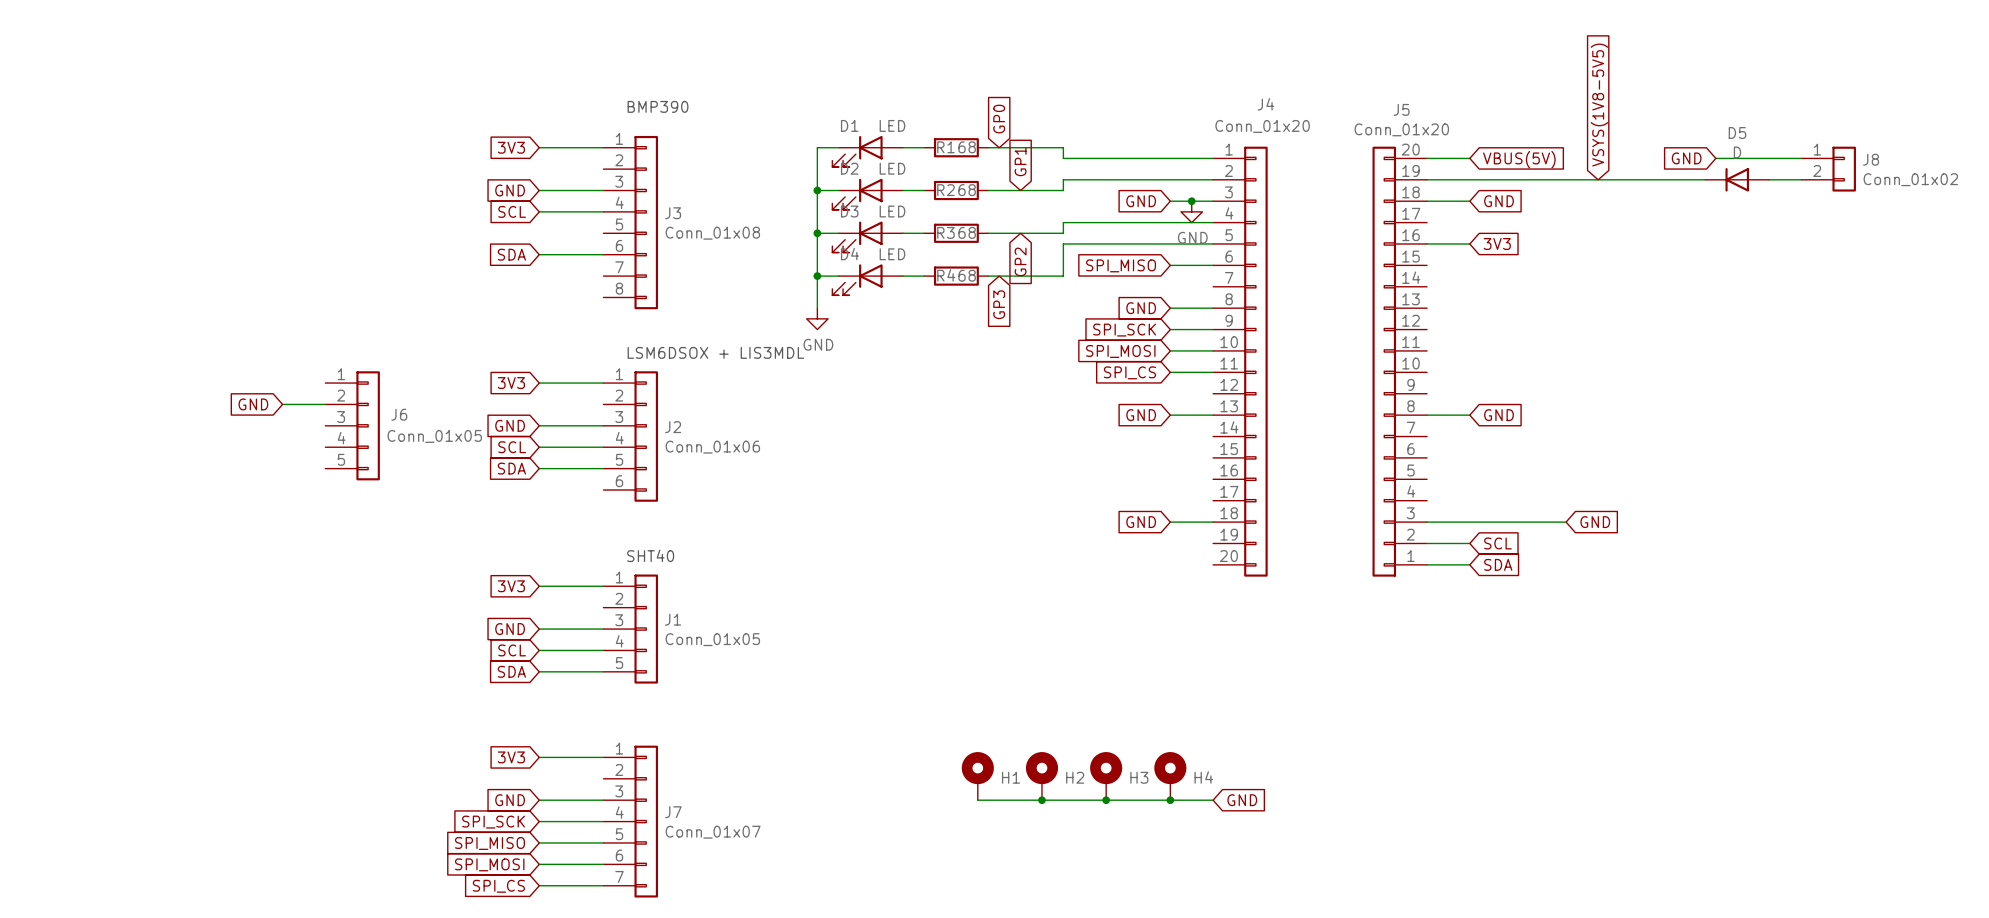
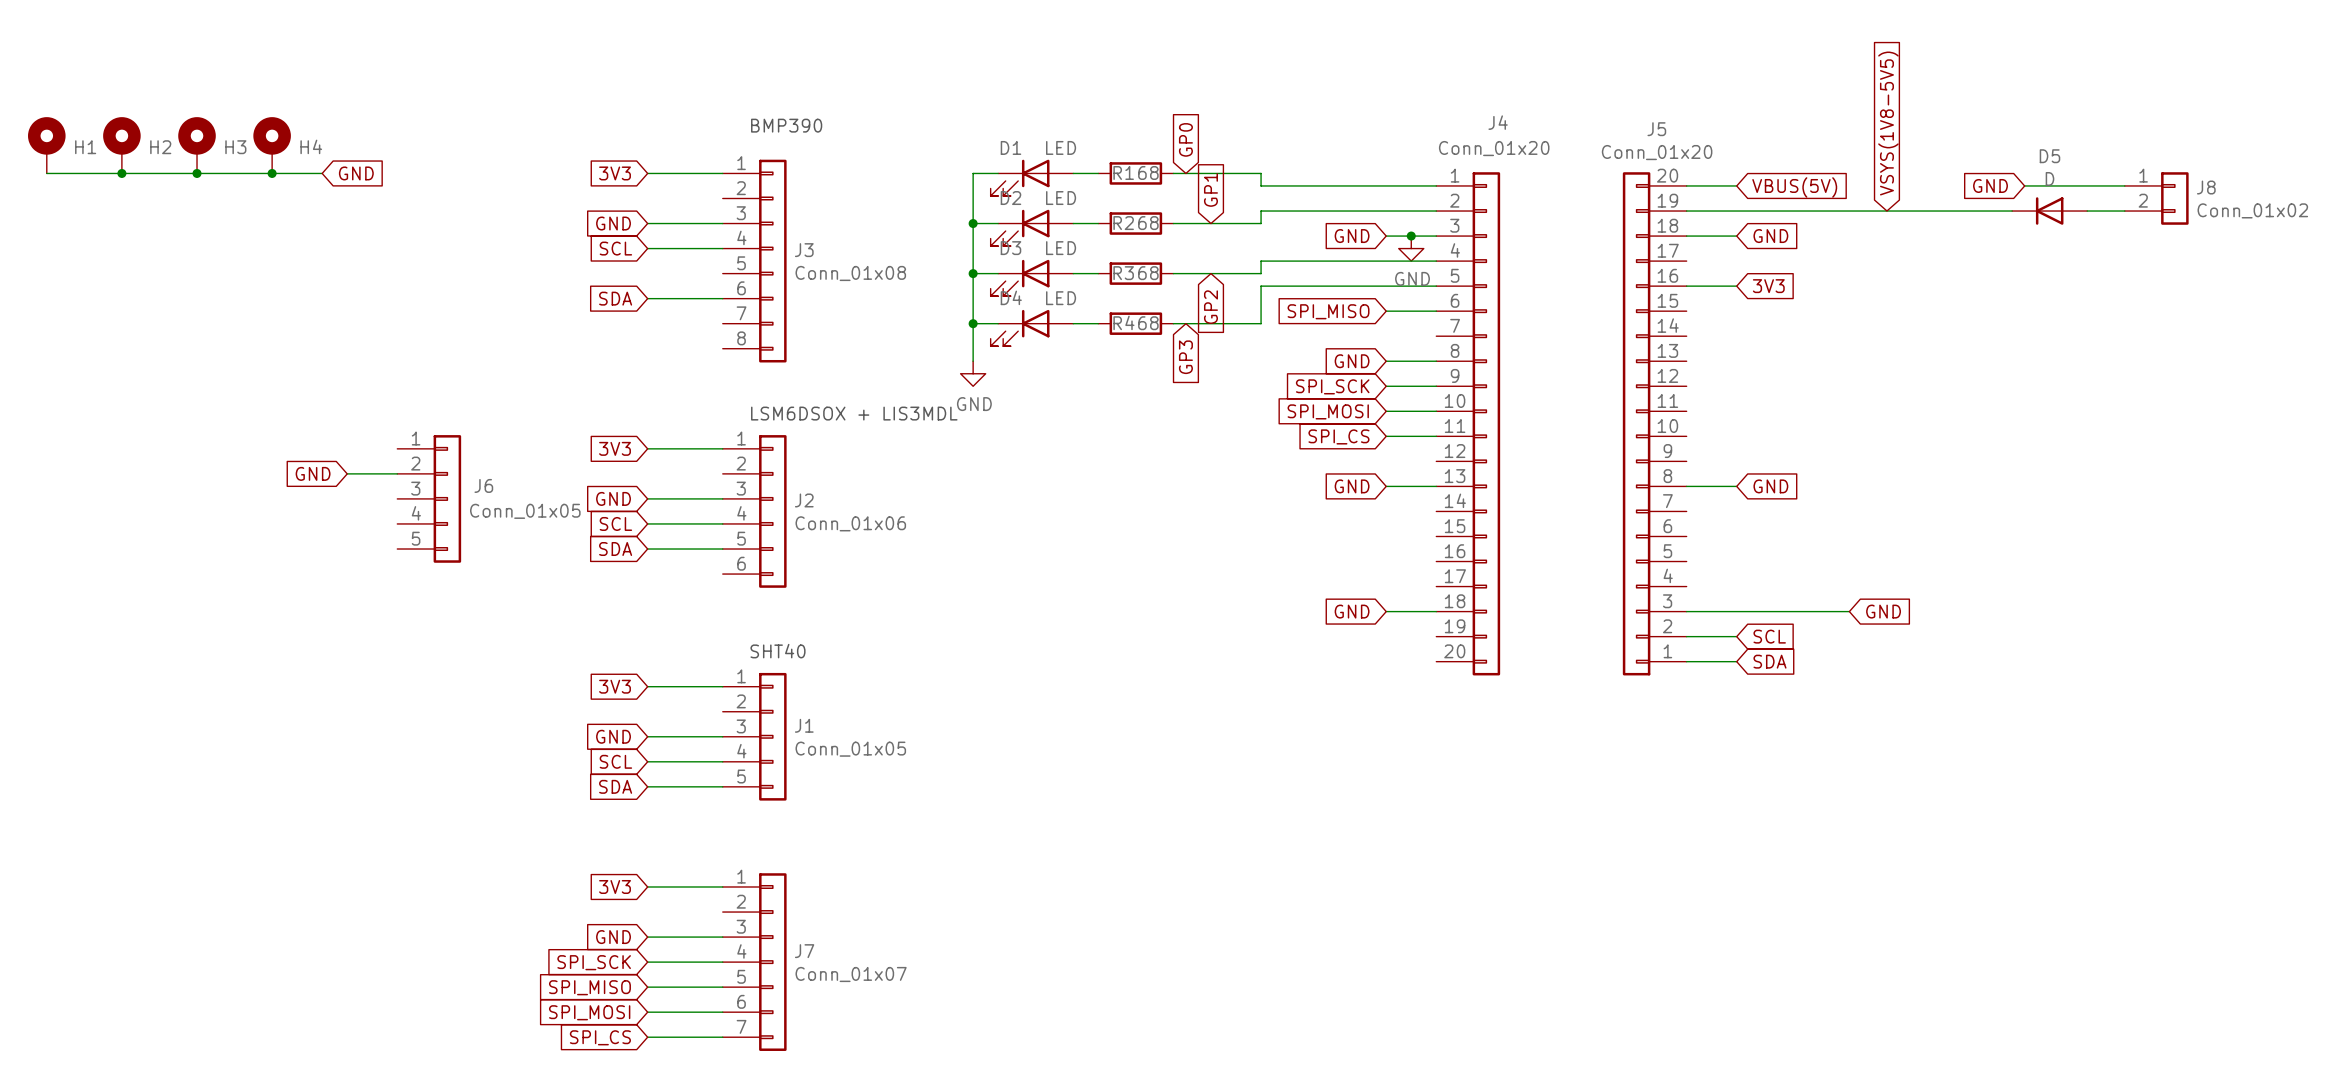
wire: none -> (46, 173) (322, 173)
junction: none -> (121, 173)
junction: none -> (197, 173)
junction: none -> (272, 173)
global label: none -> GND (356, 173)
H1 position: (977, 776) -> (46, 145)
H2 position: (1041, 776) -> (121, 145)
H3 position: (1106, 776) -> (197, 145)
H4 position: (1170, 776) -> (272, 145)
wire: (977, 800) (1213, 800) -> none
junction: (1041, 800) -> none
junction: (1106, 800) -> none
junction: (1170, 800) -> none
global label: GND (1242, 800) -> none

